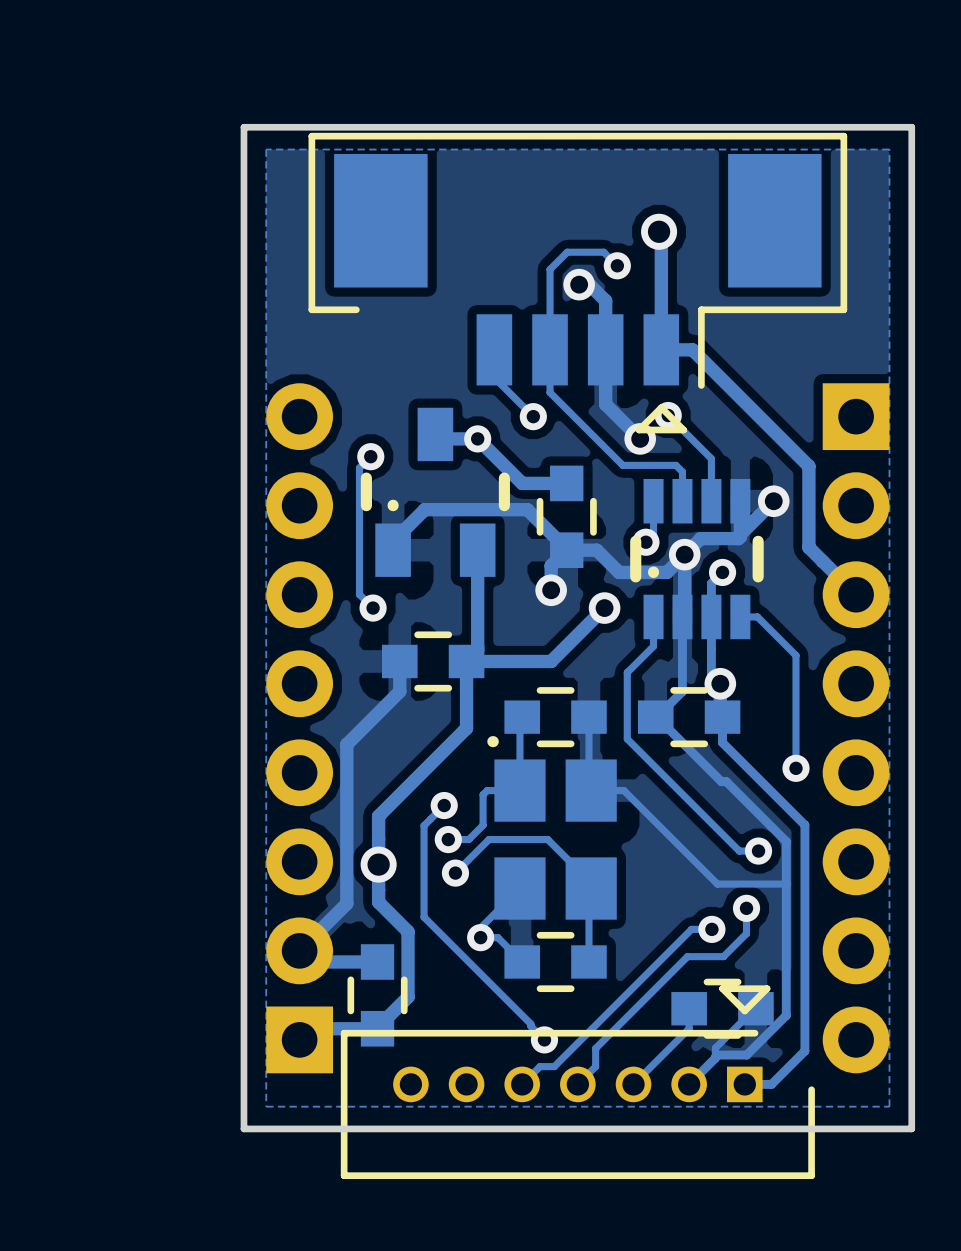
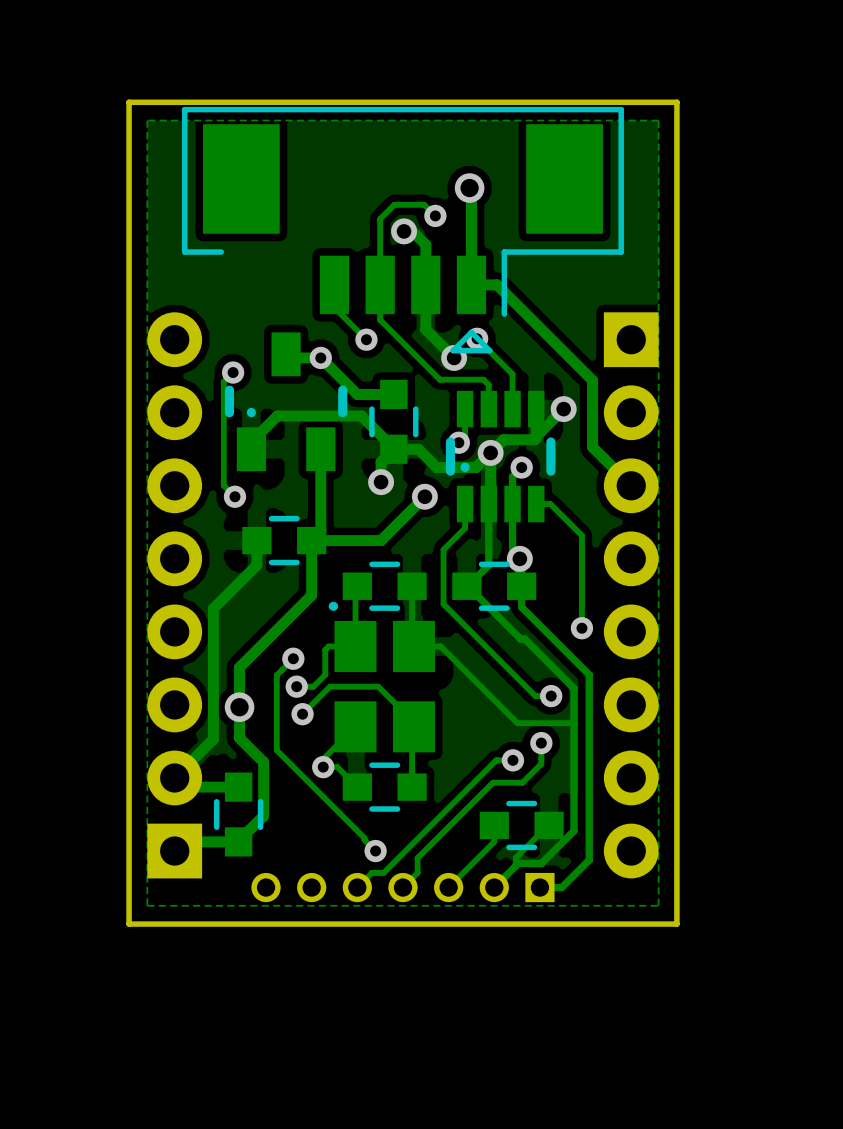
part side: bottom (577, 1082) -> top (402, 887)

